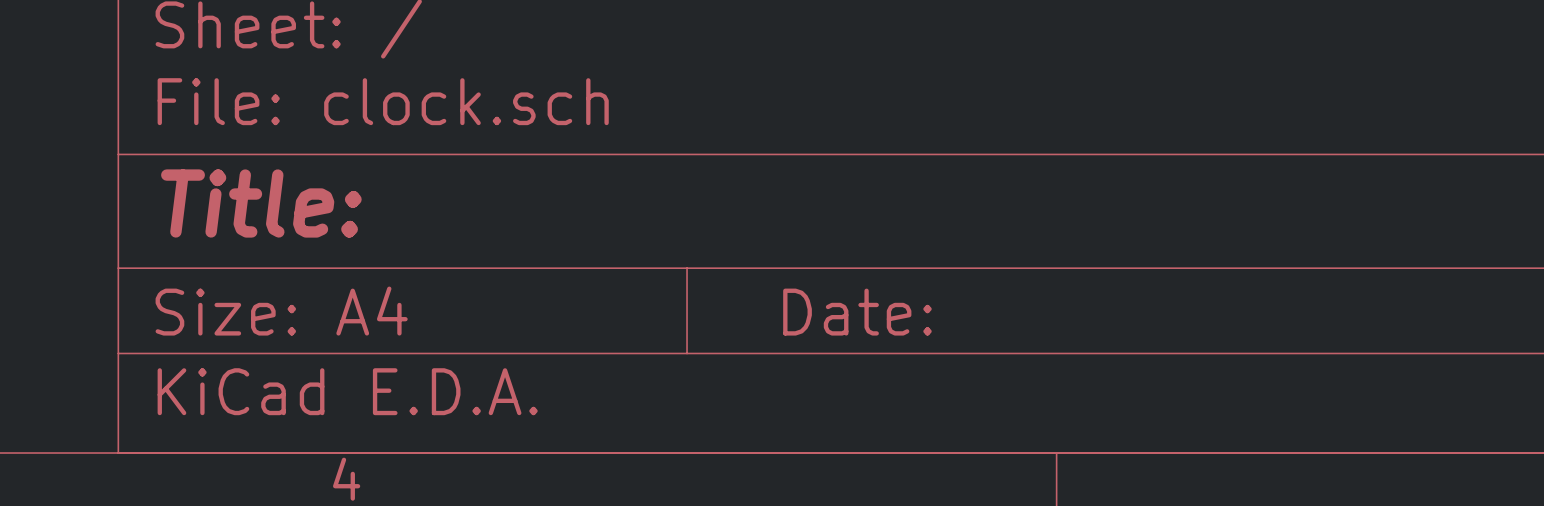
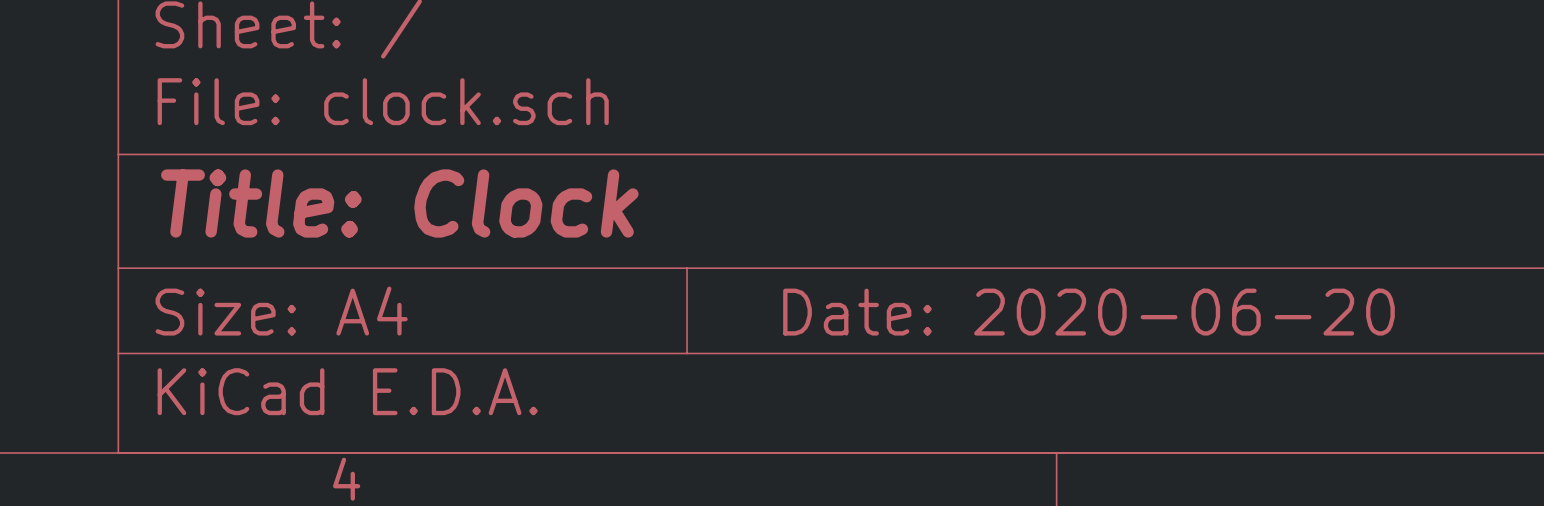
title block: Title: (261, 203) -> Title: Clock (399, 203)
title block: Date: (857, 312) -> Date: 2020-06-20 (1088, 312)

